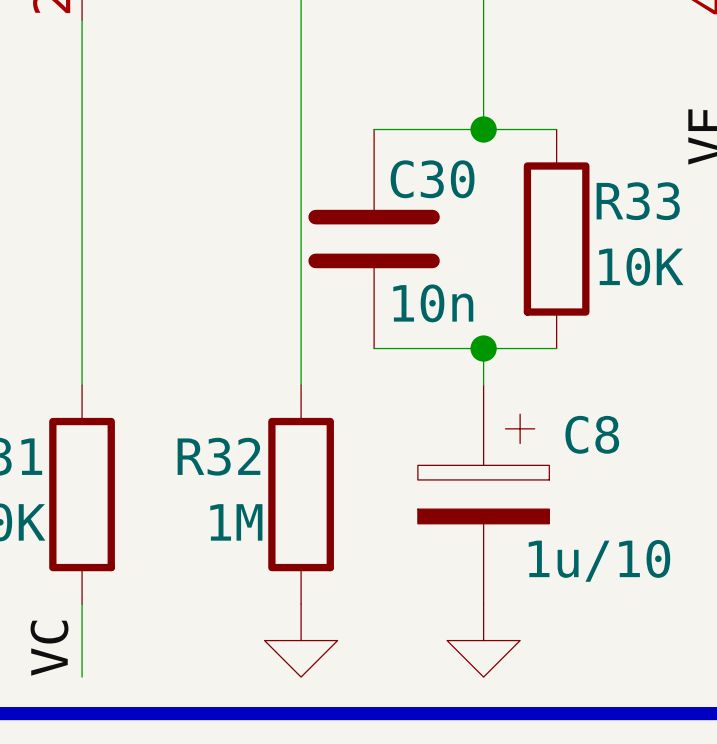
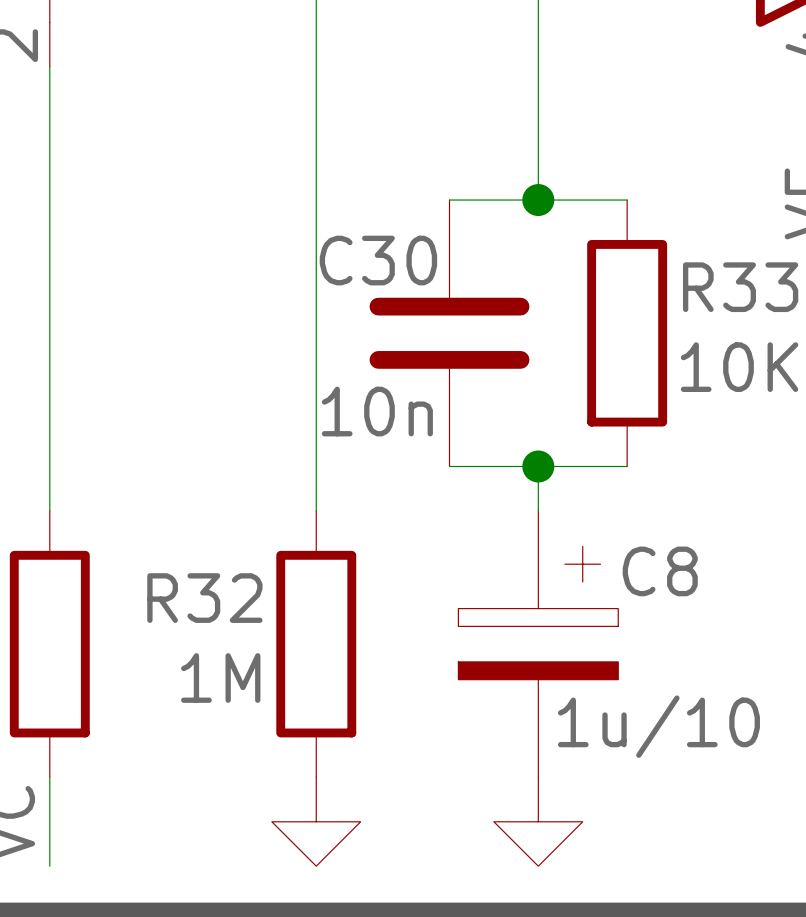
wire: (374, 129) (410, 129) -> none
C30 name position: C30 (432, 179) -> C30 (378, 260)
C30 position: (374, 239) -> (449, 333)
C30 value position: 10n (433, 303) -> 10n (377, 411)
wire: (374, 348) (410, 348) -> none

